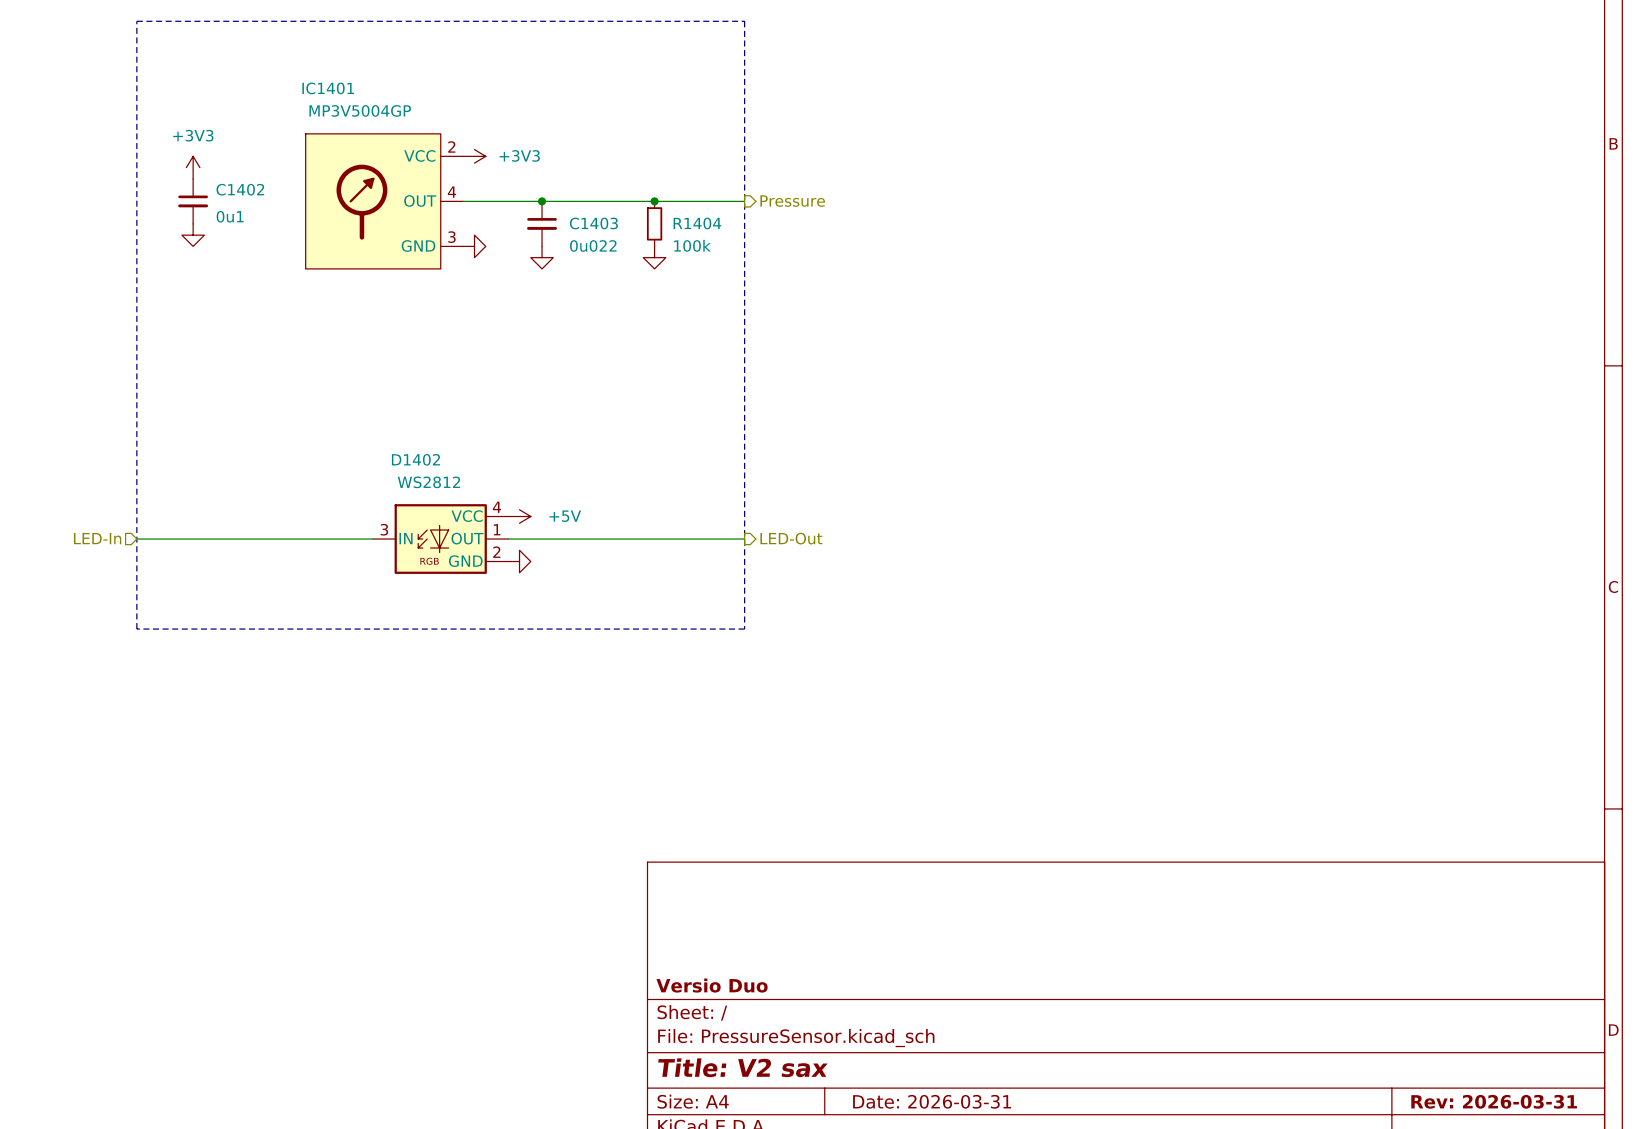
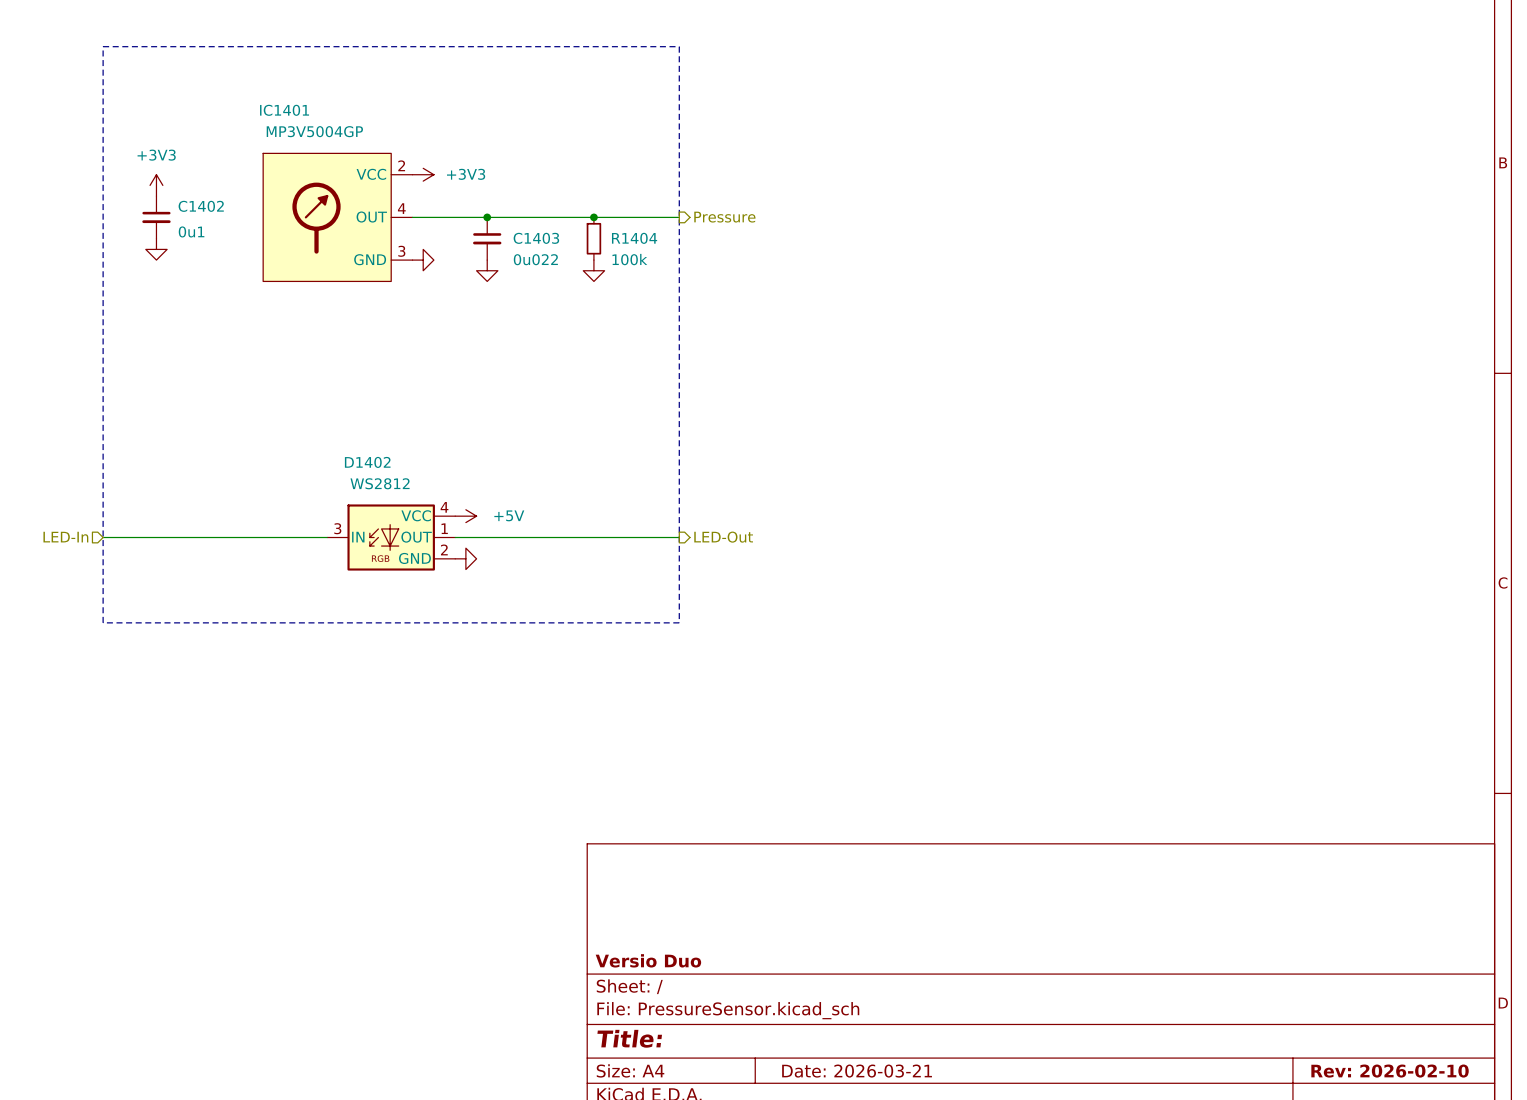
title block: Title: V2 sax (742, 1067) -> Title: (629, 1038)
title block: Date: 2026-03-31 (932, 1101) -> Date: 2026-03-21 (857, 1071)
title block: Rev: 2026-03-31 (1494, 1101) -> Rev: 2026-02-10 (1390, 1071)

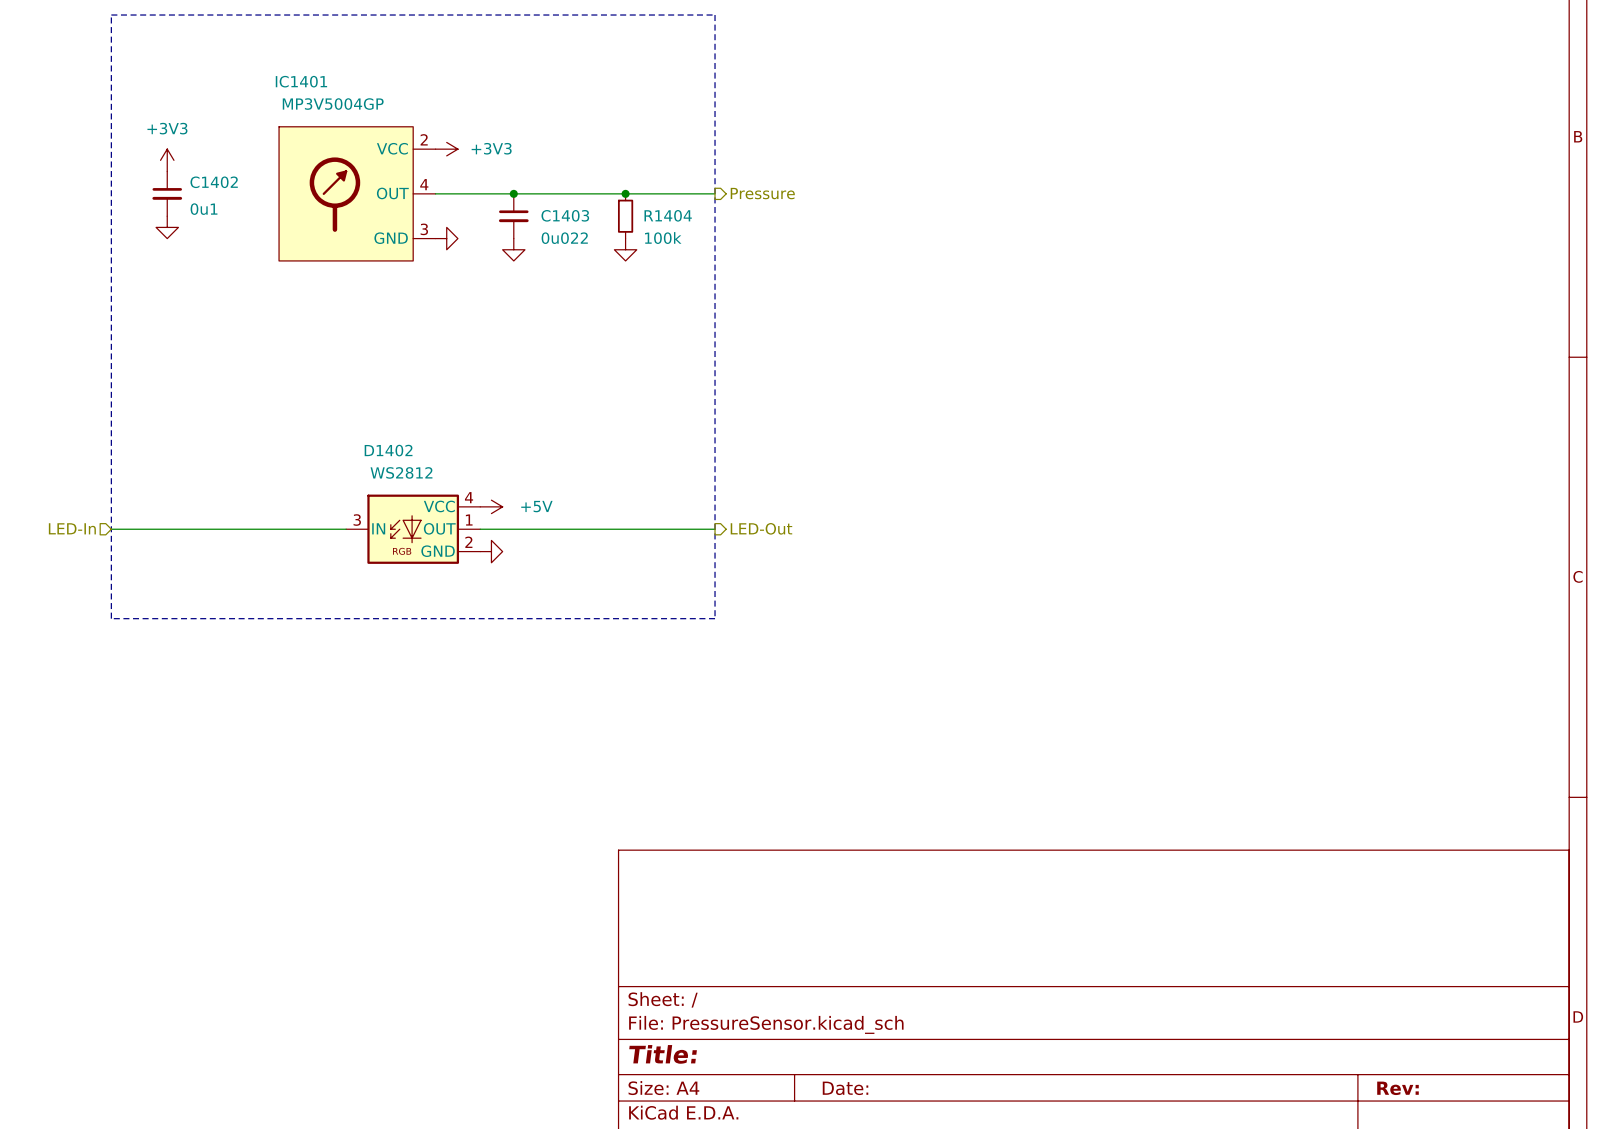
title block: Versio Duo (648, 960) -> none
title block: Date: 2026-03-21 (857, 1071) -> Date: (845, 1088)
title block: Rev: 2026-02-10 (1390, 1071) -> Rev: (1397, 1088)

